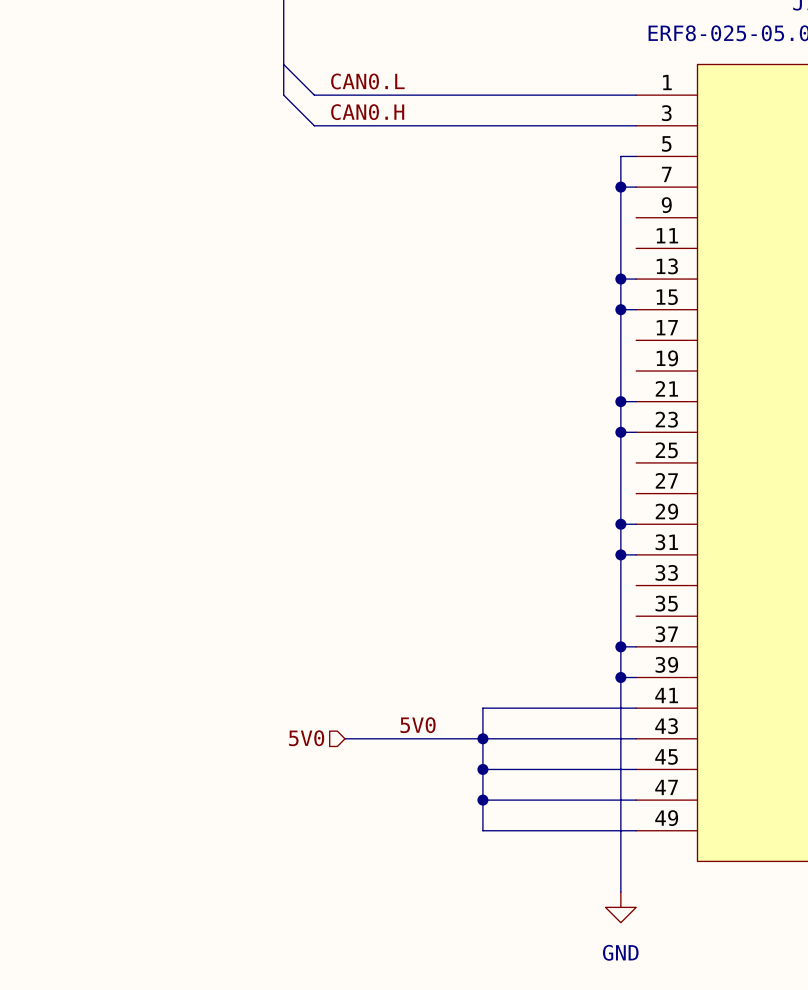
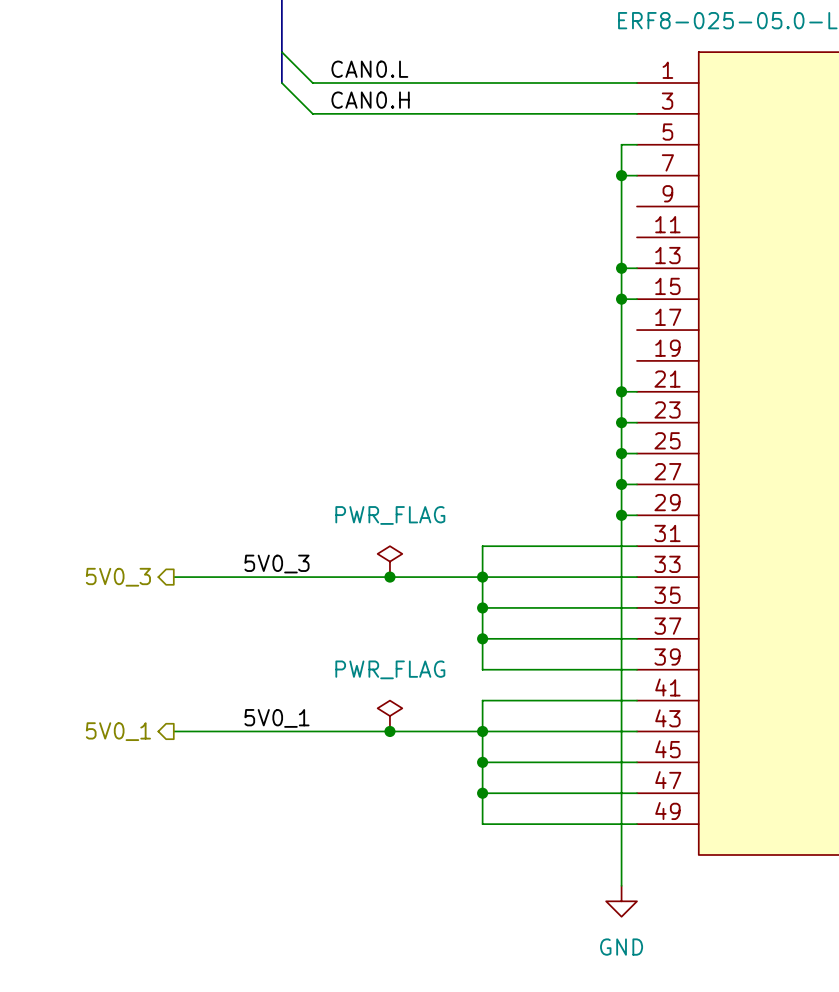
wire: none -> (621, 453) (637, 453)
junction: none -> (621, 453)
wire: none -> (621, 484) (637, 484)
junction: none -> (621, 484)
wire: none -> (621, 546) (482, 546) (482, 669) (621, 669)
junction: (620, 554) -> none
power symbol: none -> PWR_FLAG (389, 561)
label: none -> 5V0_3 (276, 564)
wire: none -> (173, 577) (637, 577)
junction: none -> (389, 577)
junction: none -> (482, 577)
hierarchical label: none -> 5V0_3 (118, 577)
wire: none -> (482, 607) (637, 607)
junction: none -> (482, 607)
wire: none -> (482, 638) (621, 638)
junction: none -> (482, 638)
junction: (620, 646) -> none
junction: (620, 677) -> none
power symbol: none -> PWR_FLAG (389, 716)
label: 5V0 (418, 725) -> none
label: none -> 5V0_1 (276, 718)
wire: none -> (173, 731) (343, 731)
hierarchical label: 5V0 (306, 738) -> none
junction: none -> (389, 731)
hierarchical label: none -> 5V0_1 (118, 731)

